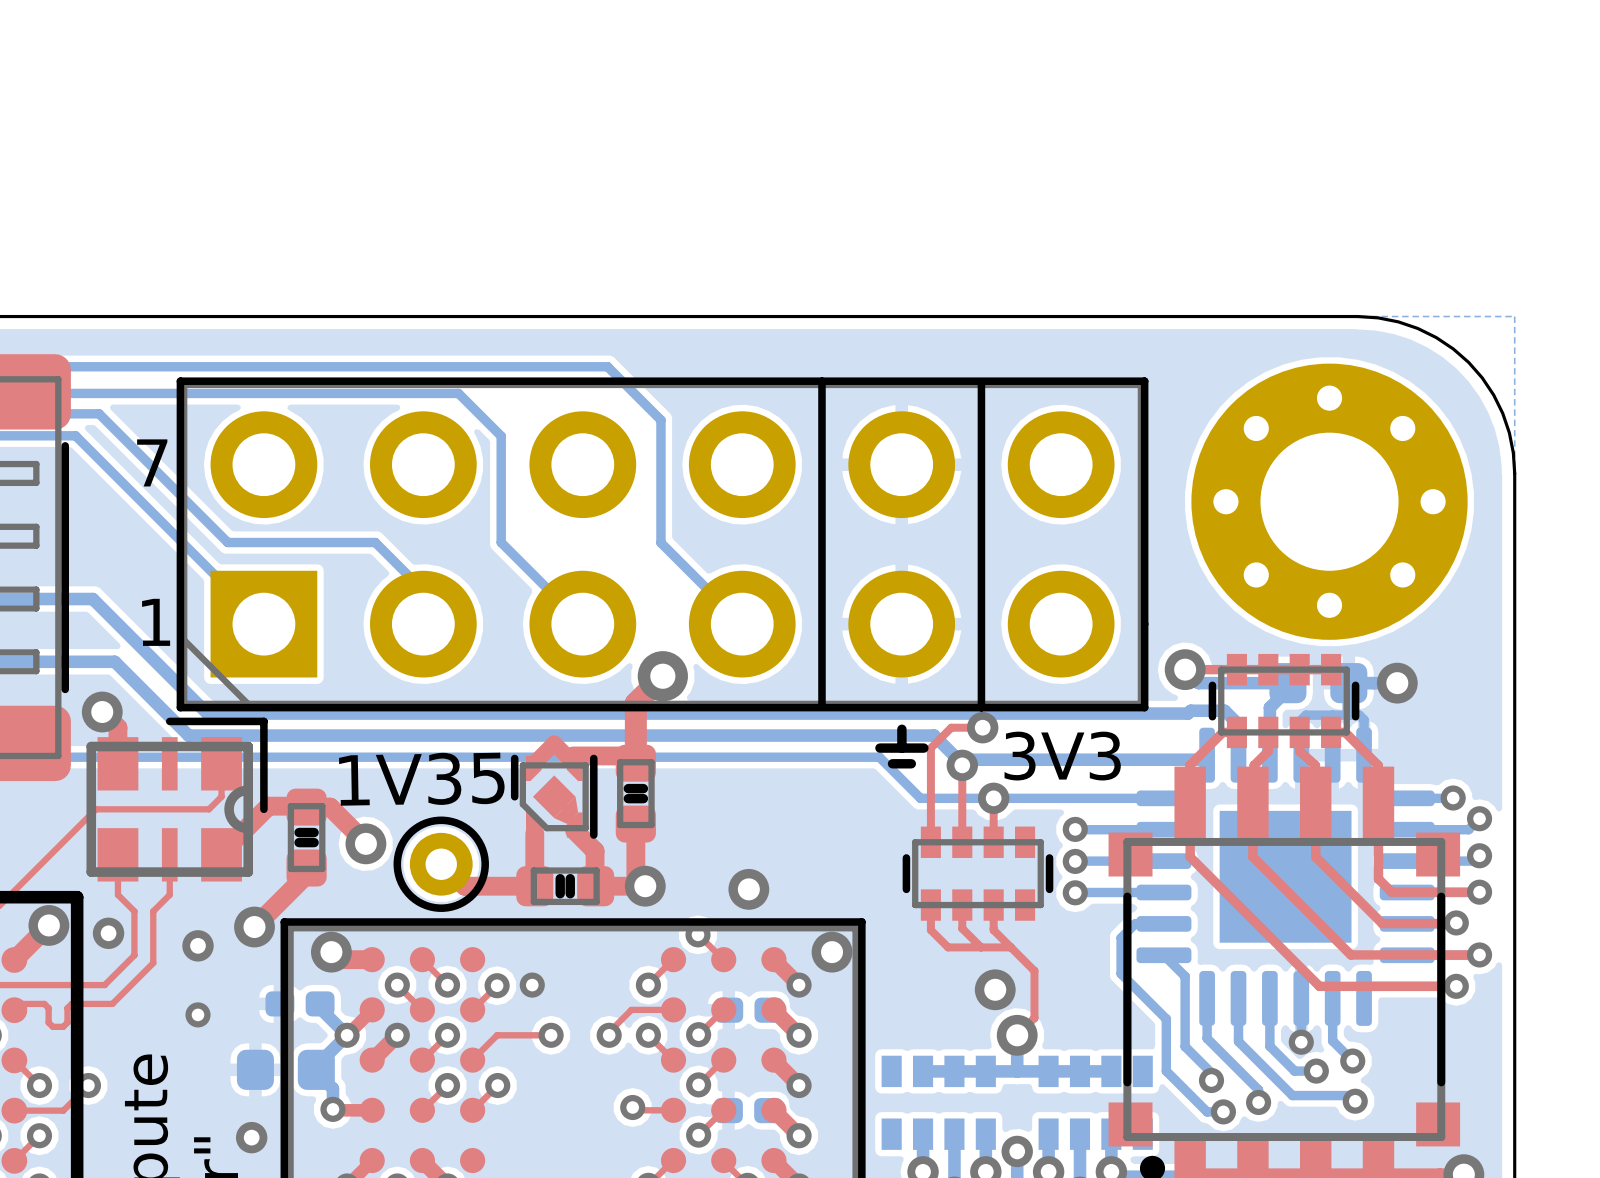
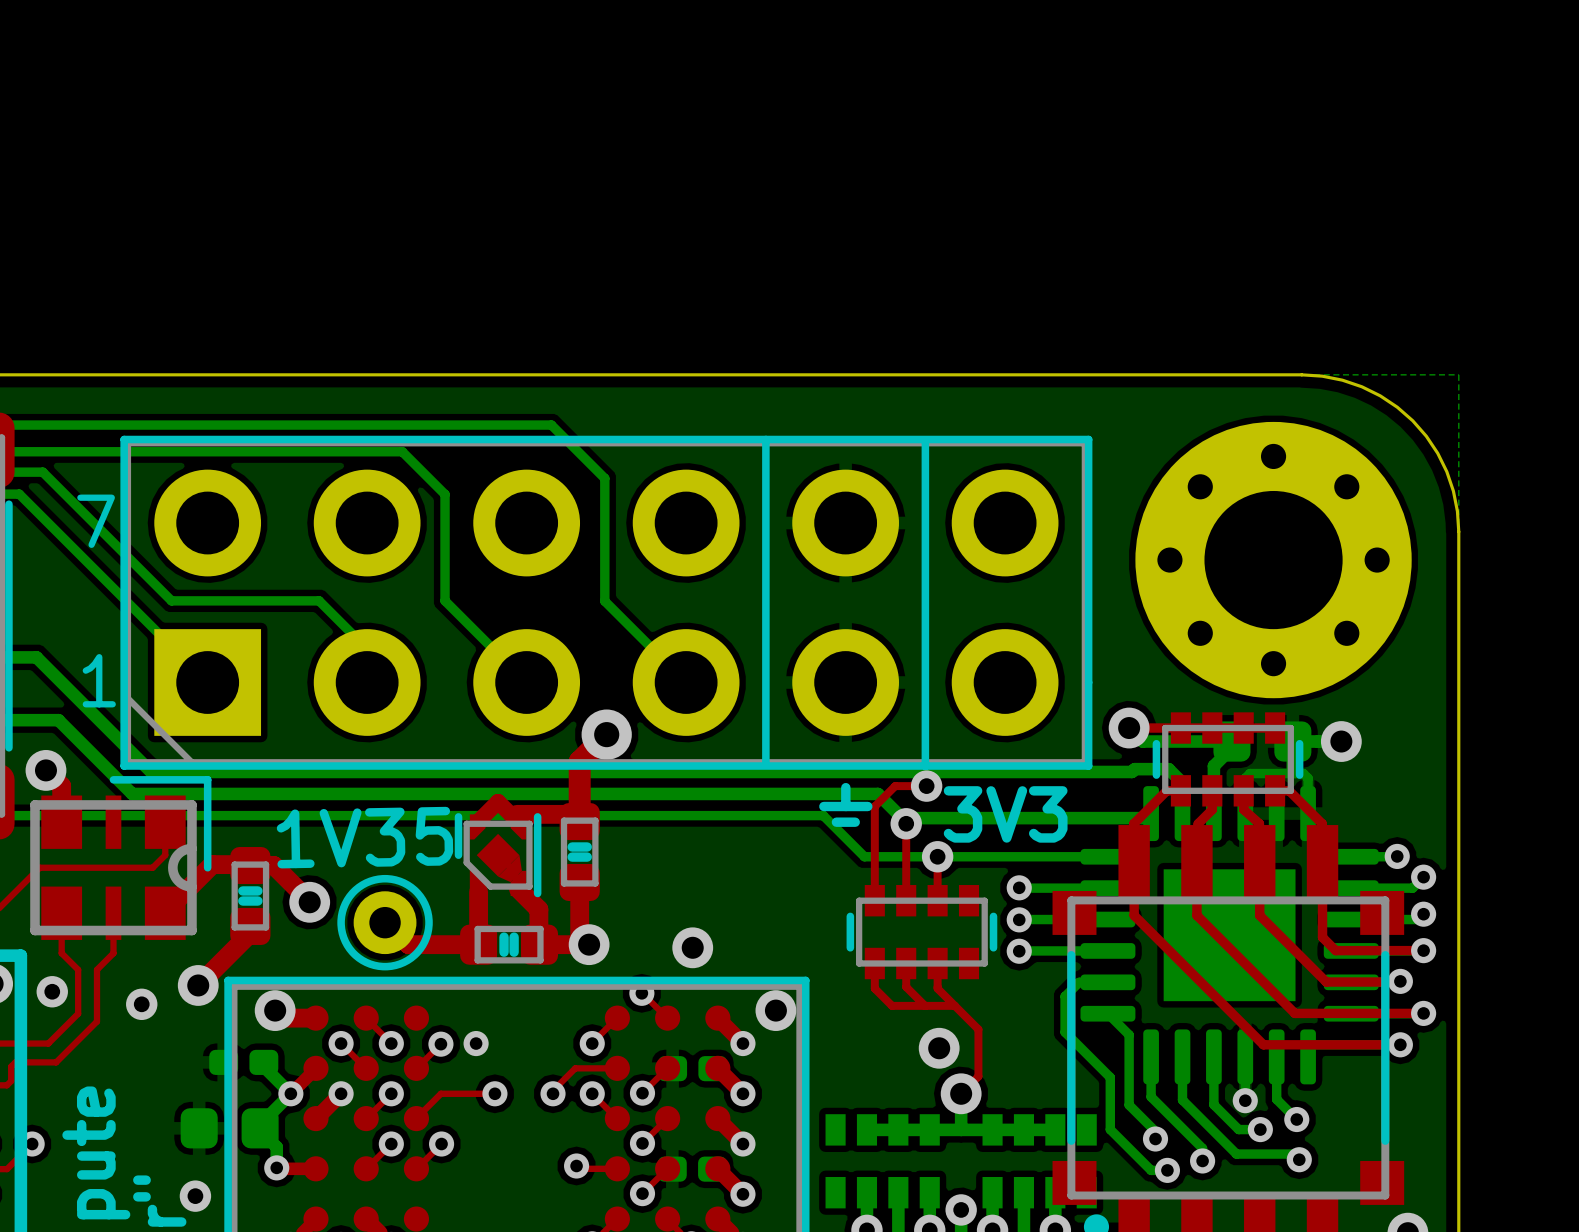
via: (198, 1014) -> none

